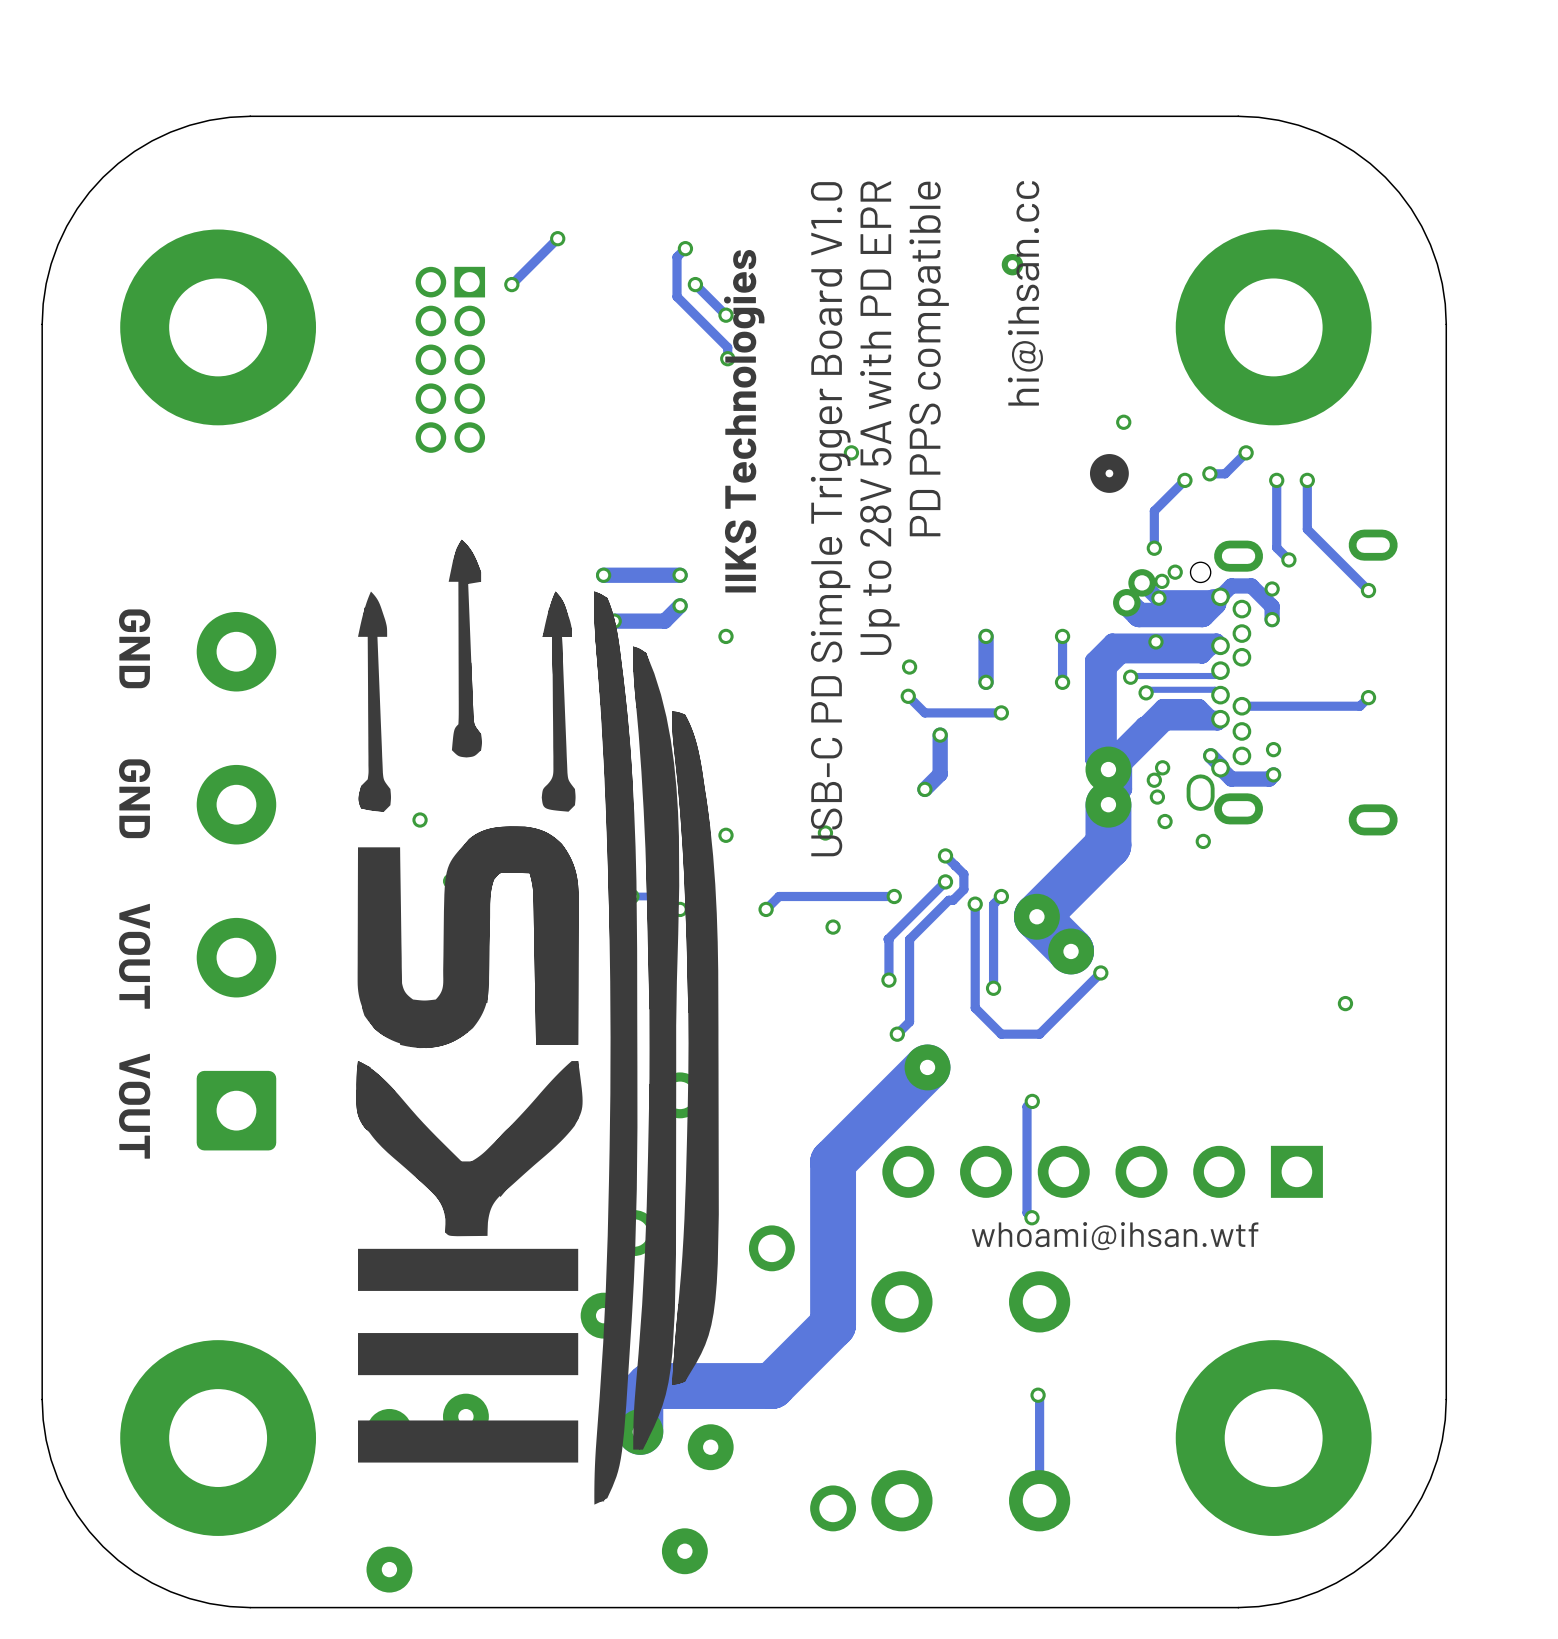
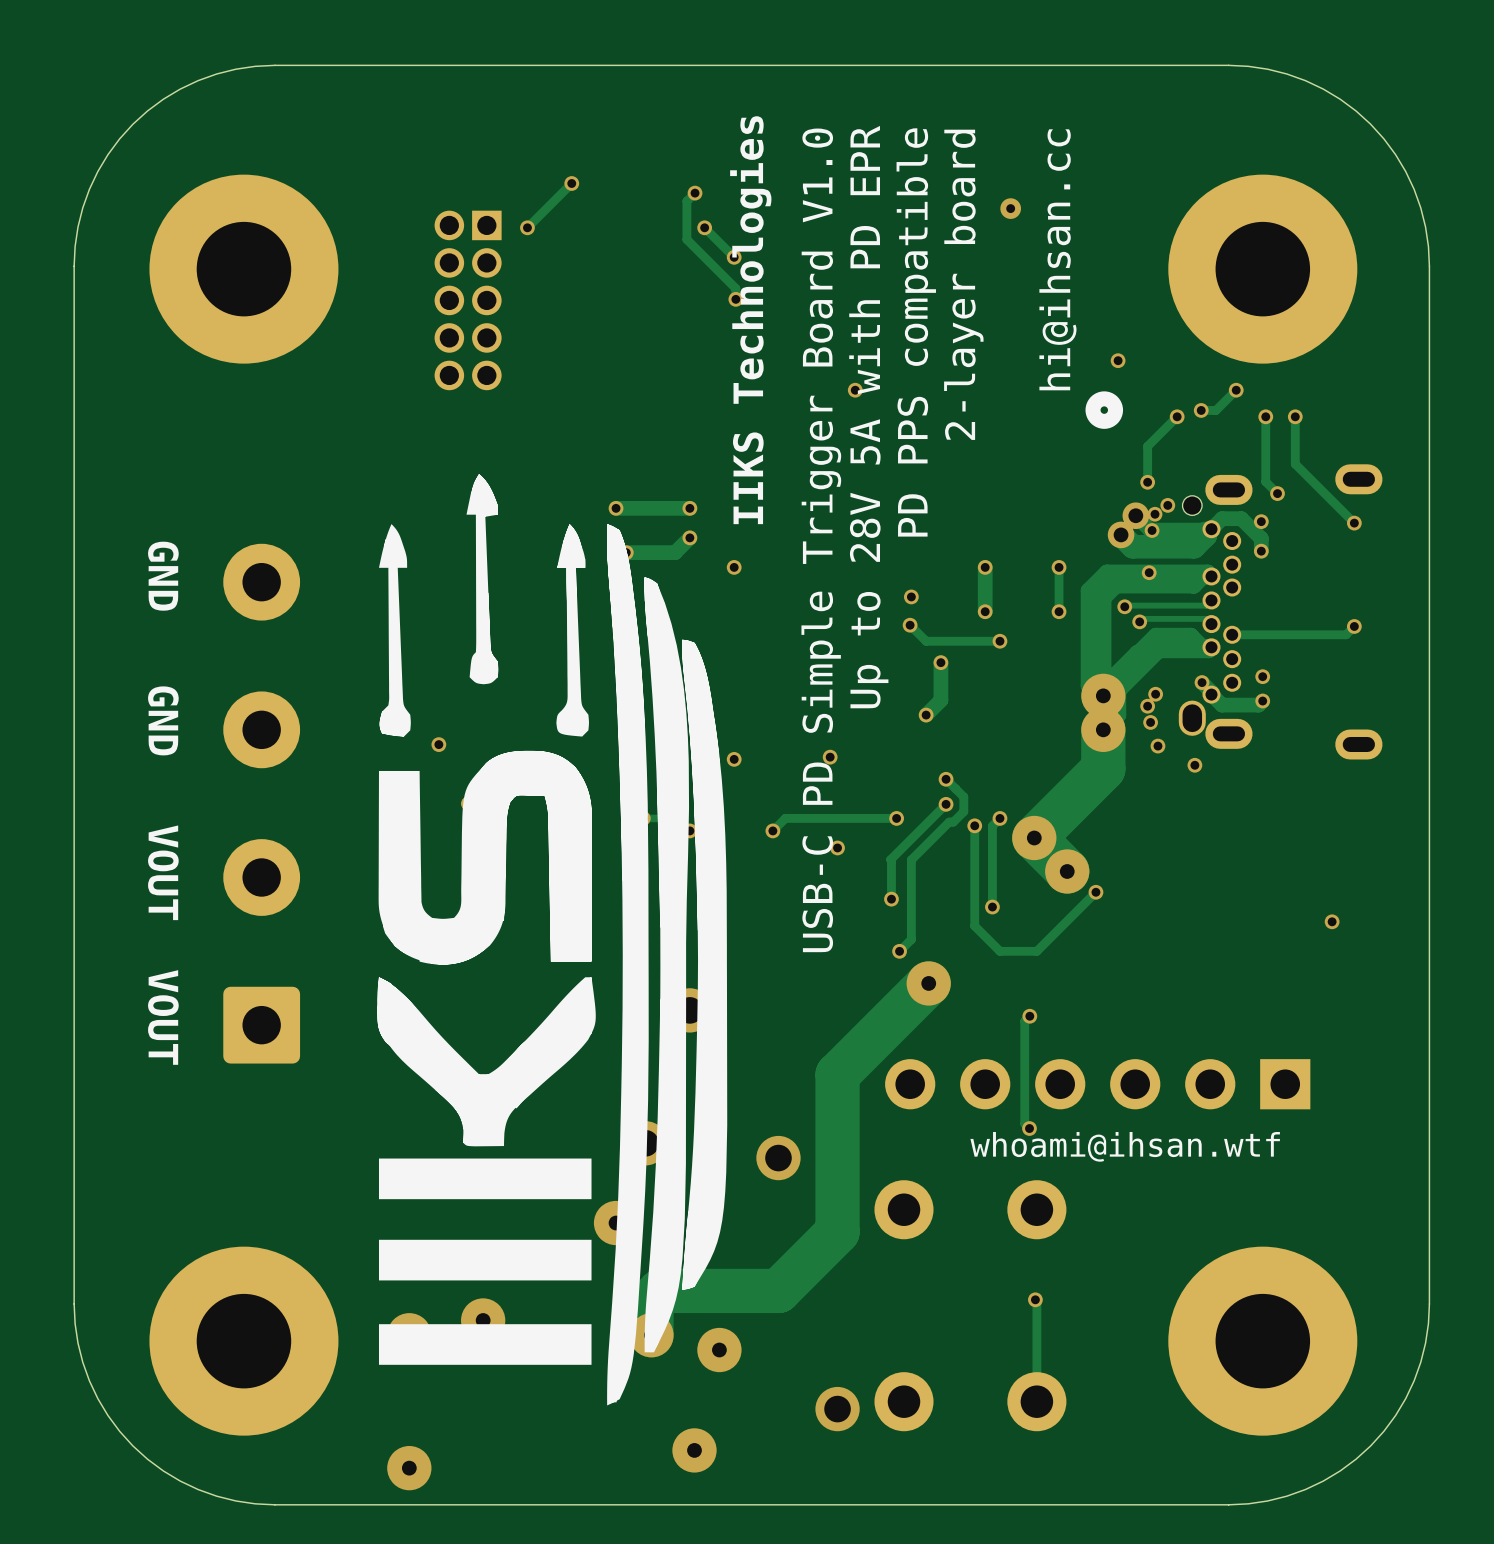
text position: hi@ihsan.cc (1025, 293) -> hi@ihsan.cc (1057, 259)
text: none -> 2-layer board (963, 284)
text position: PD PPS compatible (929, 358) -> PD PPS compatible (916, 332)
text position: Up to 28V 5A with PD EPR (879, 418) -> Up to 28V 5A with PD EPR (868, 417)
text position: USB-C PD Simple Trigger Board V1.0 (830, 519) -> USB-C PD Simple Trigger Board V1.0 (821, 540)

